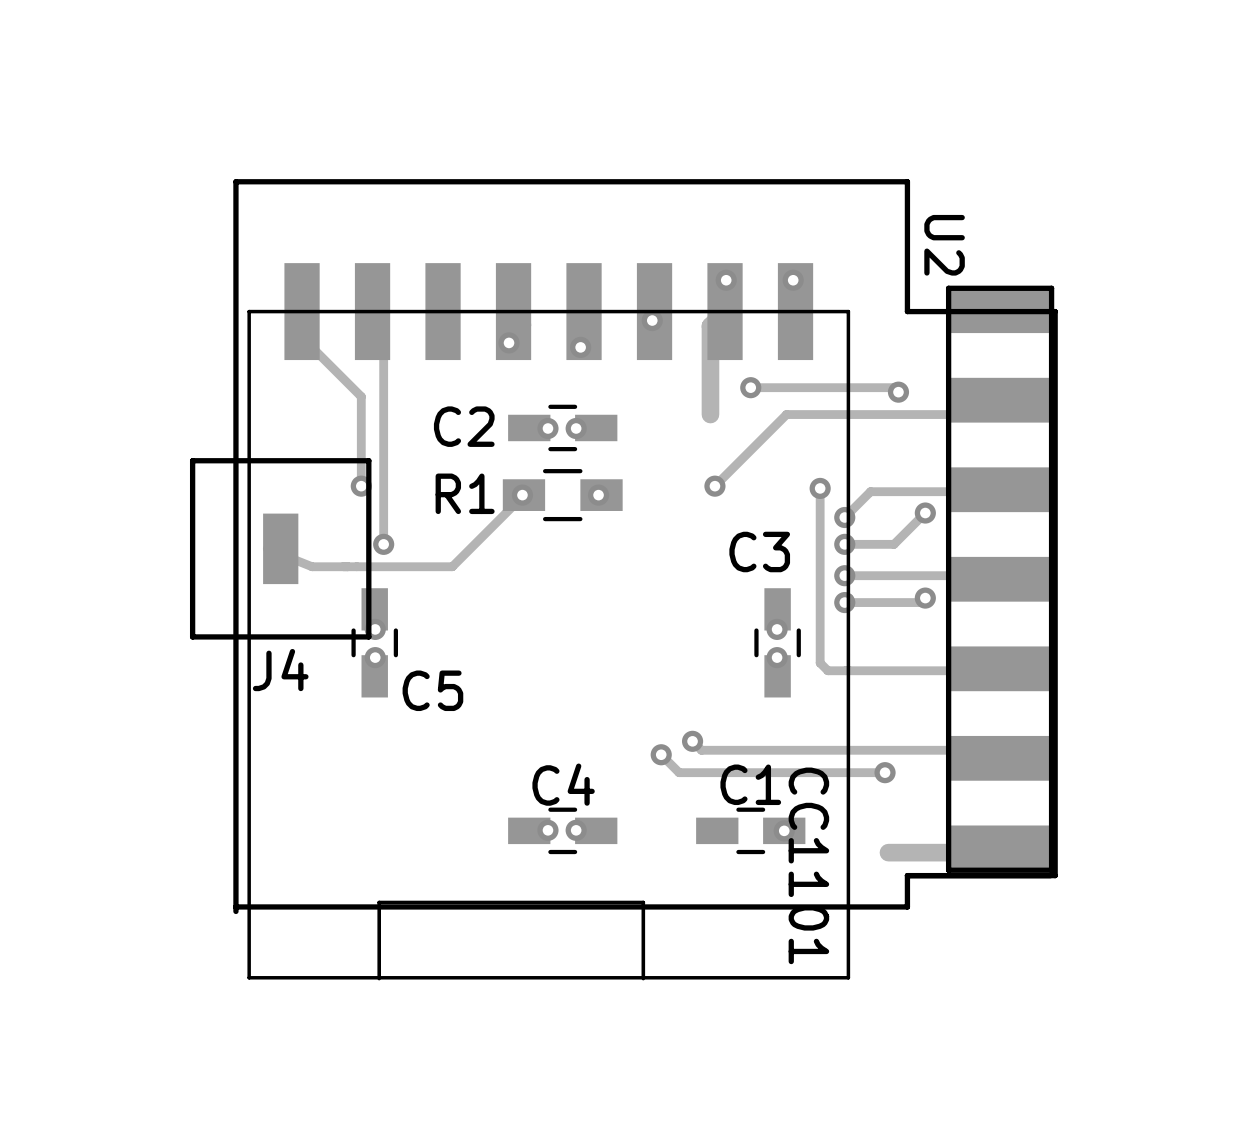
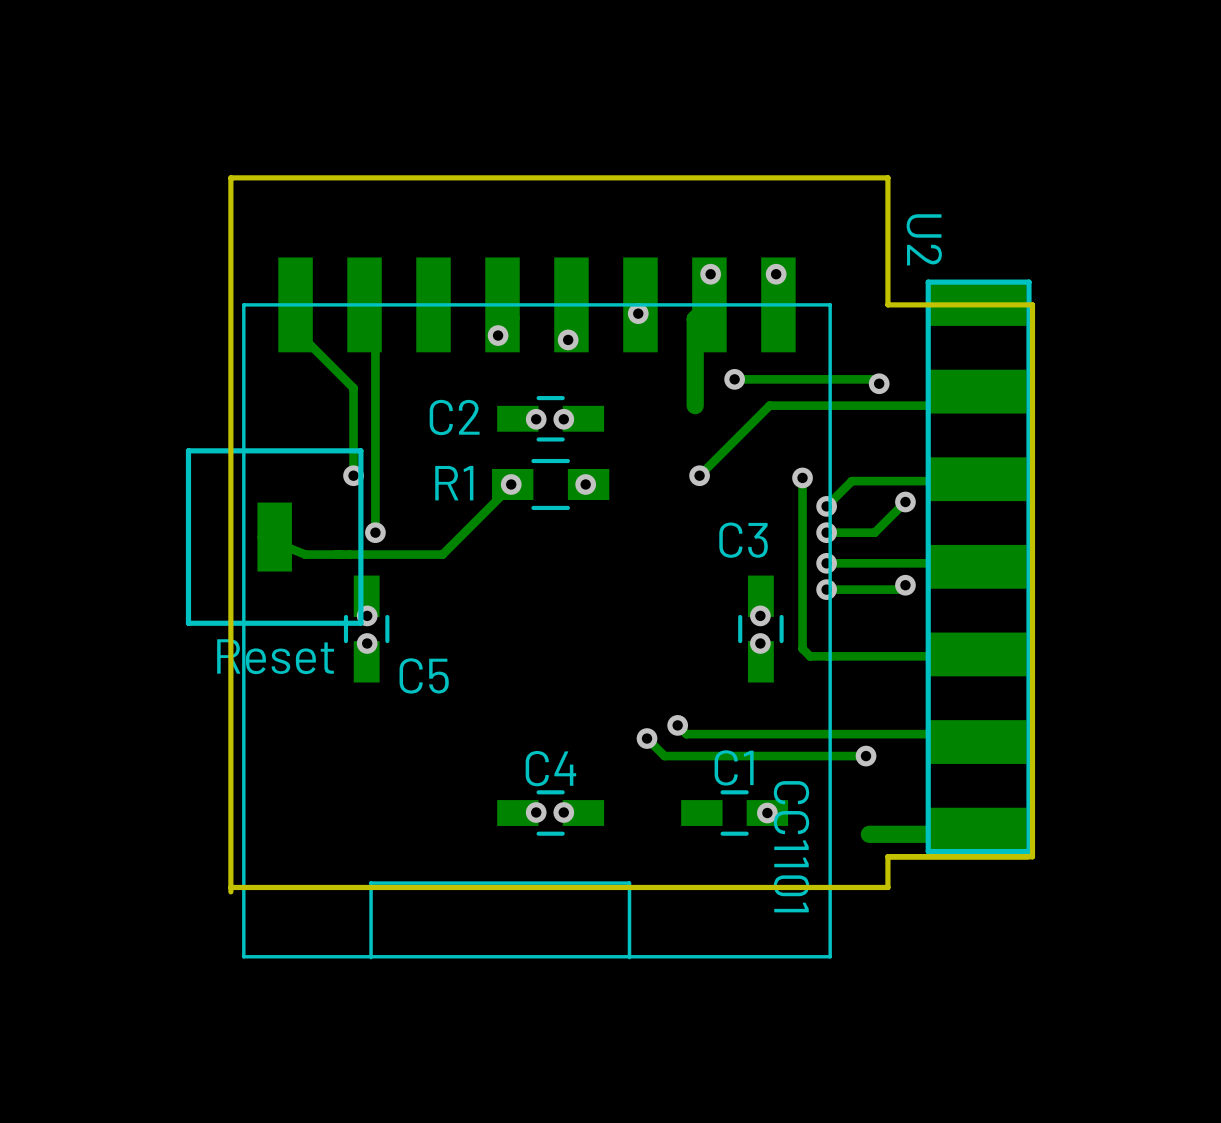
J4 name: J4 (280, 670) -> Reset (275, 656)

